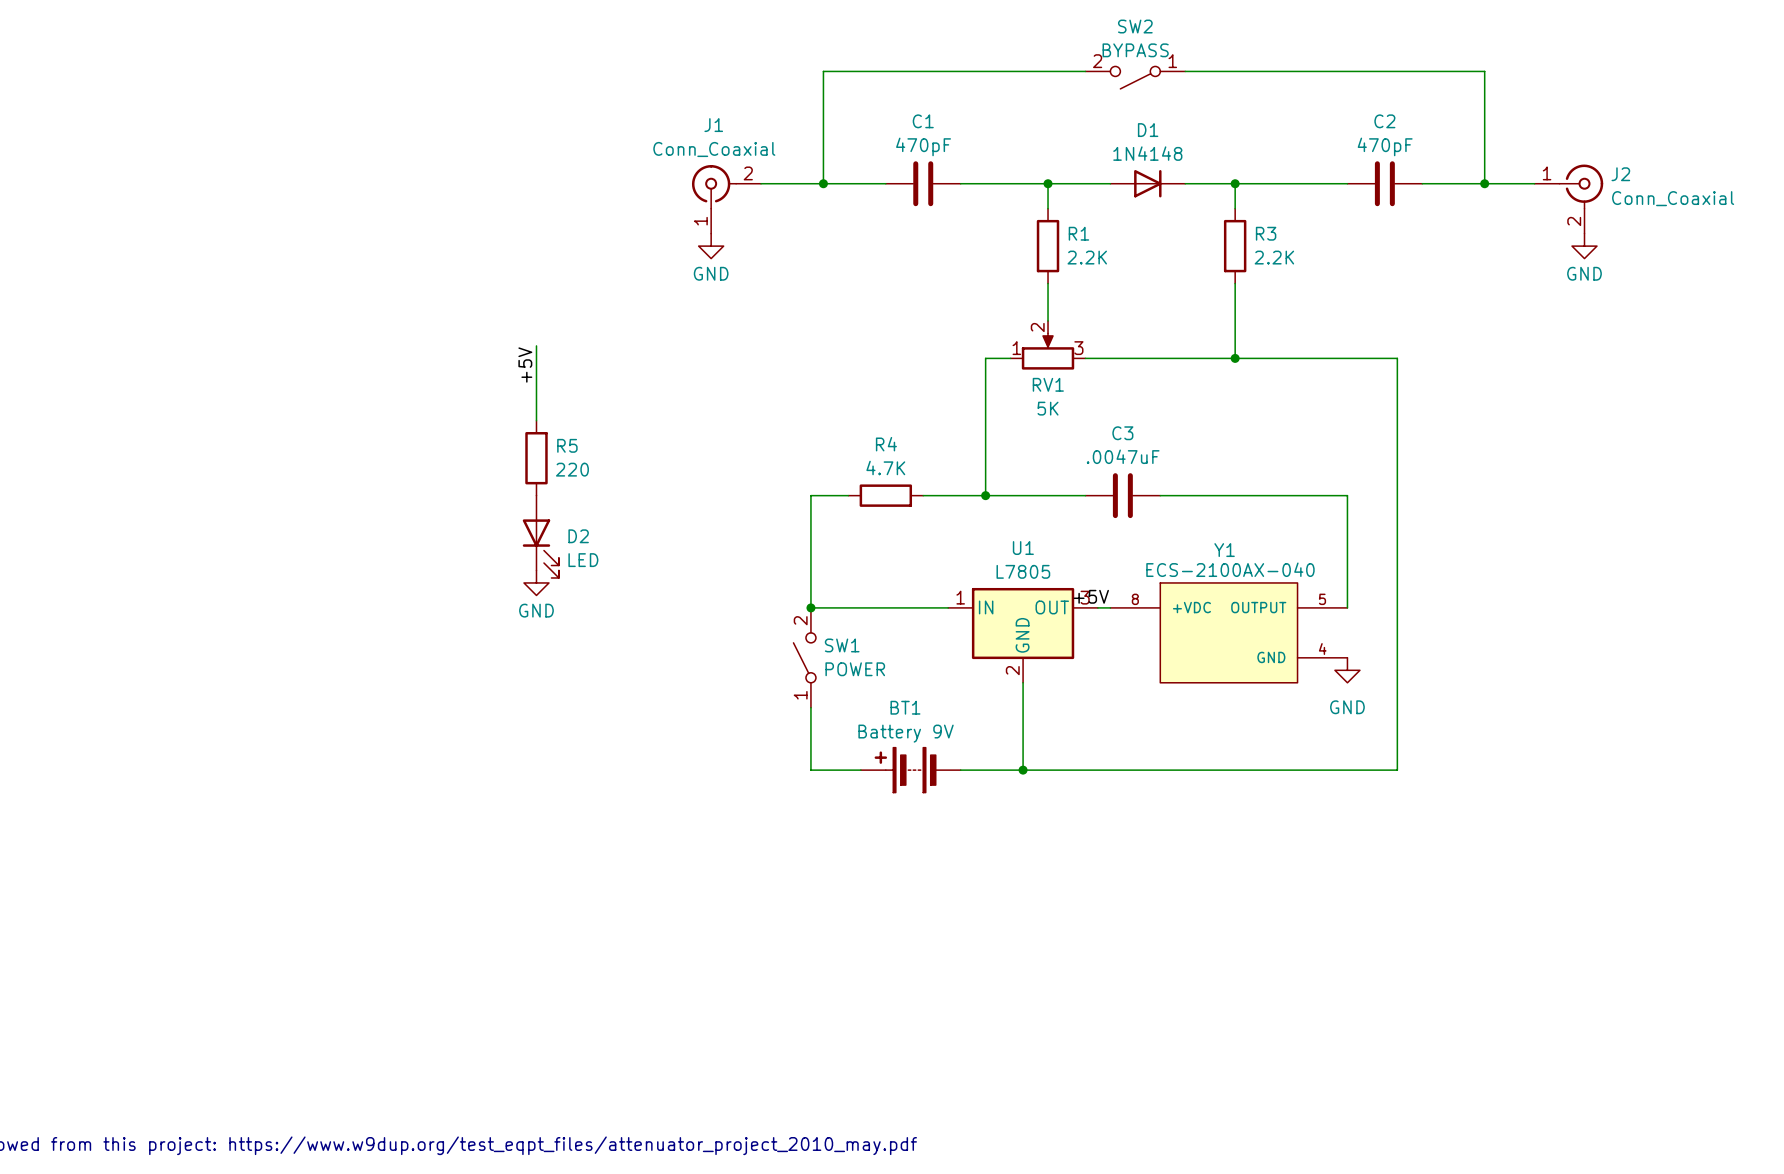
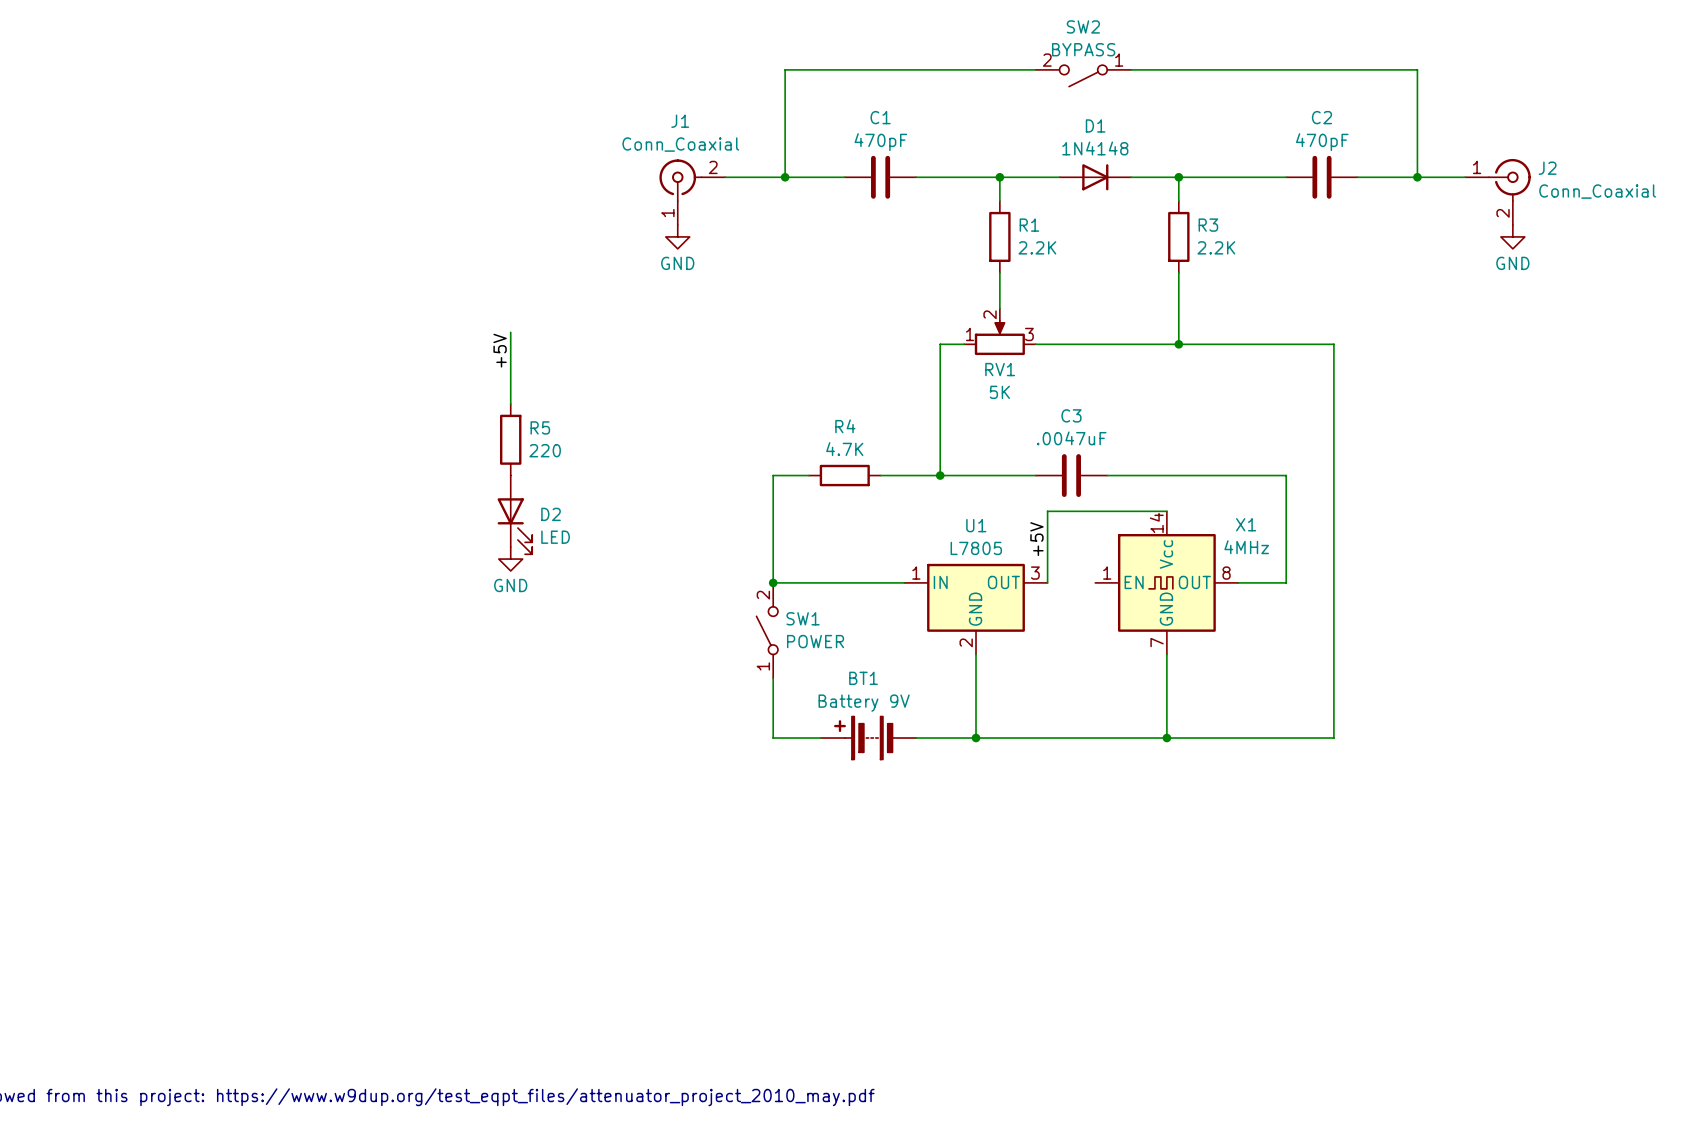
label rotation: 0° (1091, 596) -> 90° counterclockwise (1036, 539)
wire: (1097, 607) (1110, 607) -> (1047, 582) (1047, 511) (1166, 511)
X1: none -> 4MHz (1166, 582)
Y1: ECS-2100AX-040 (1228, 632) -> none
power symbol: GND (1347, 670) -> none
wire: none -> (1166, 654) (1166, 738)
junction: none -> (1166, 738)

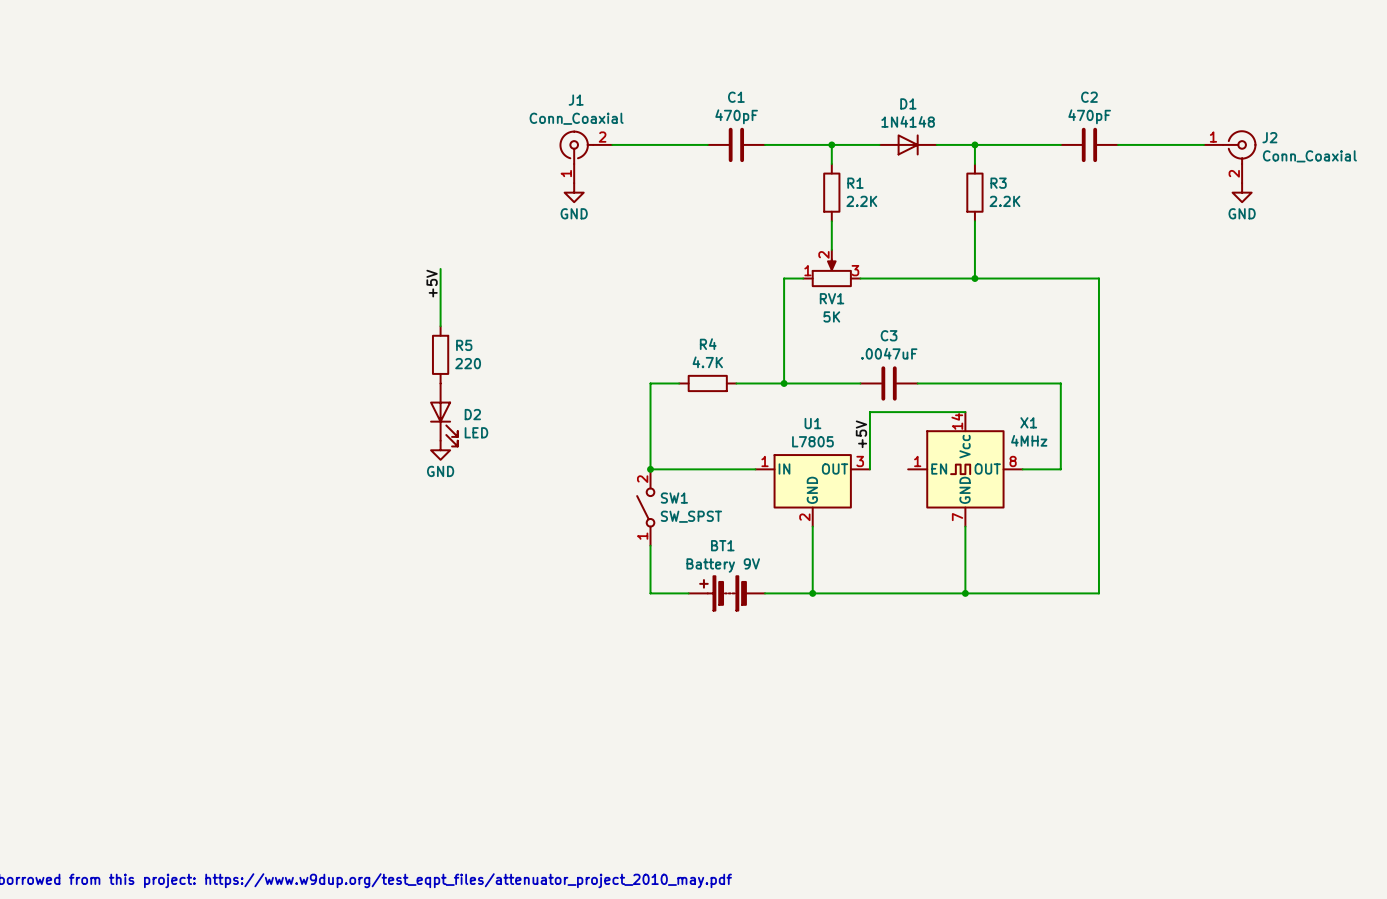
wire: (1035, 69) (785, 69) (785, 177) -> none
wire: (1131, 69) (1417, 69) (1417, 177) -> none
SW2: BYPASS (1083, 75) -> none
junction: (785, 177) -> none
junction: (1417, 177) -> none
SW1 value: POWER (815, 641) -> SW_SPST (691, 516)

